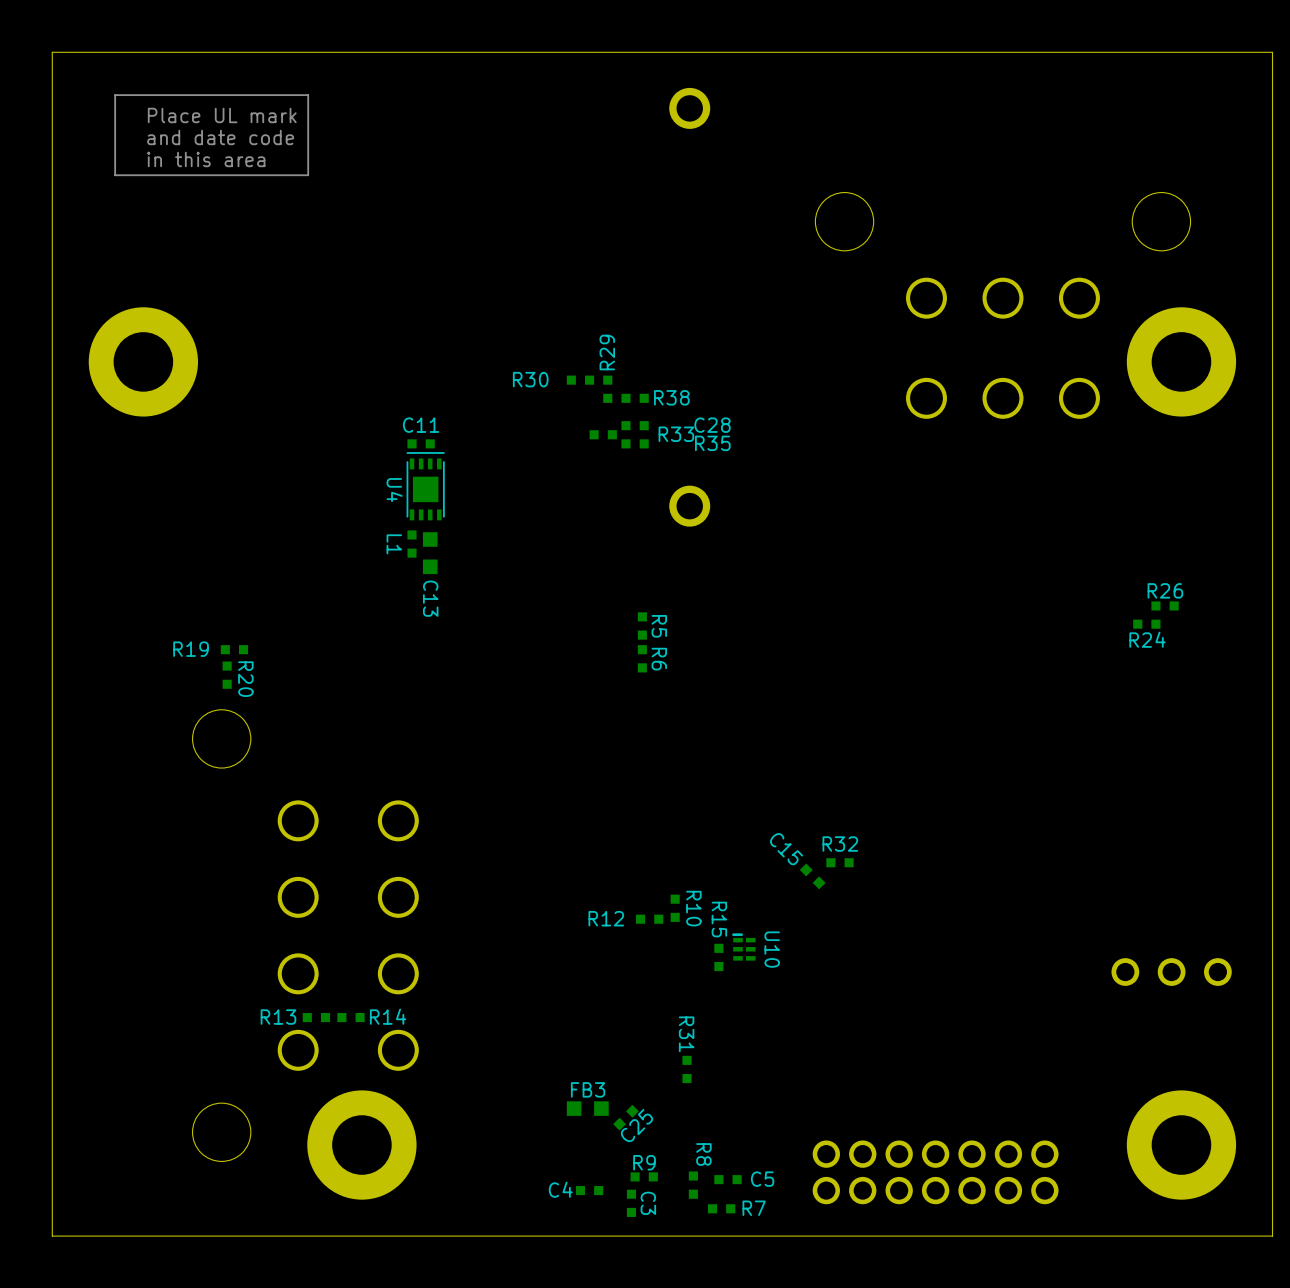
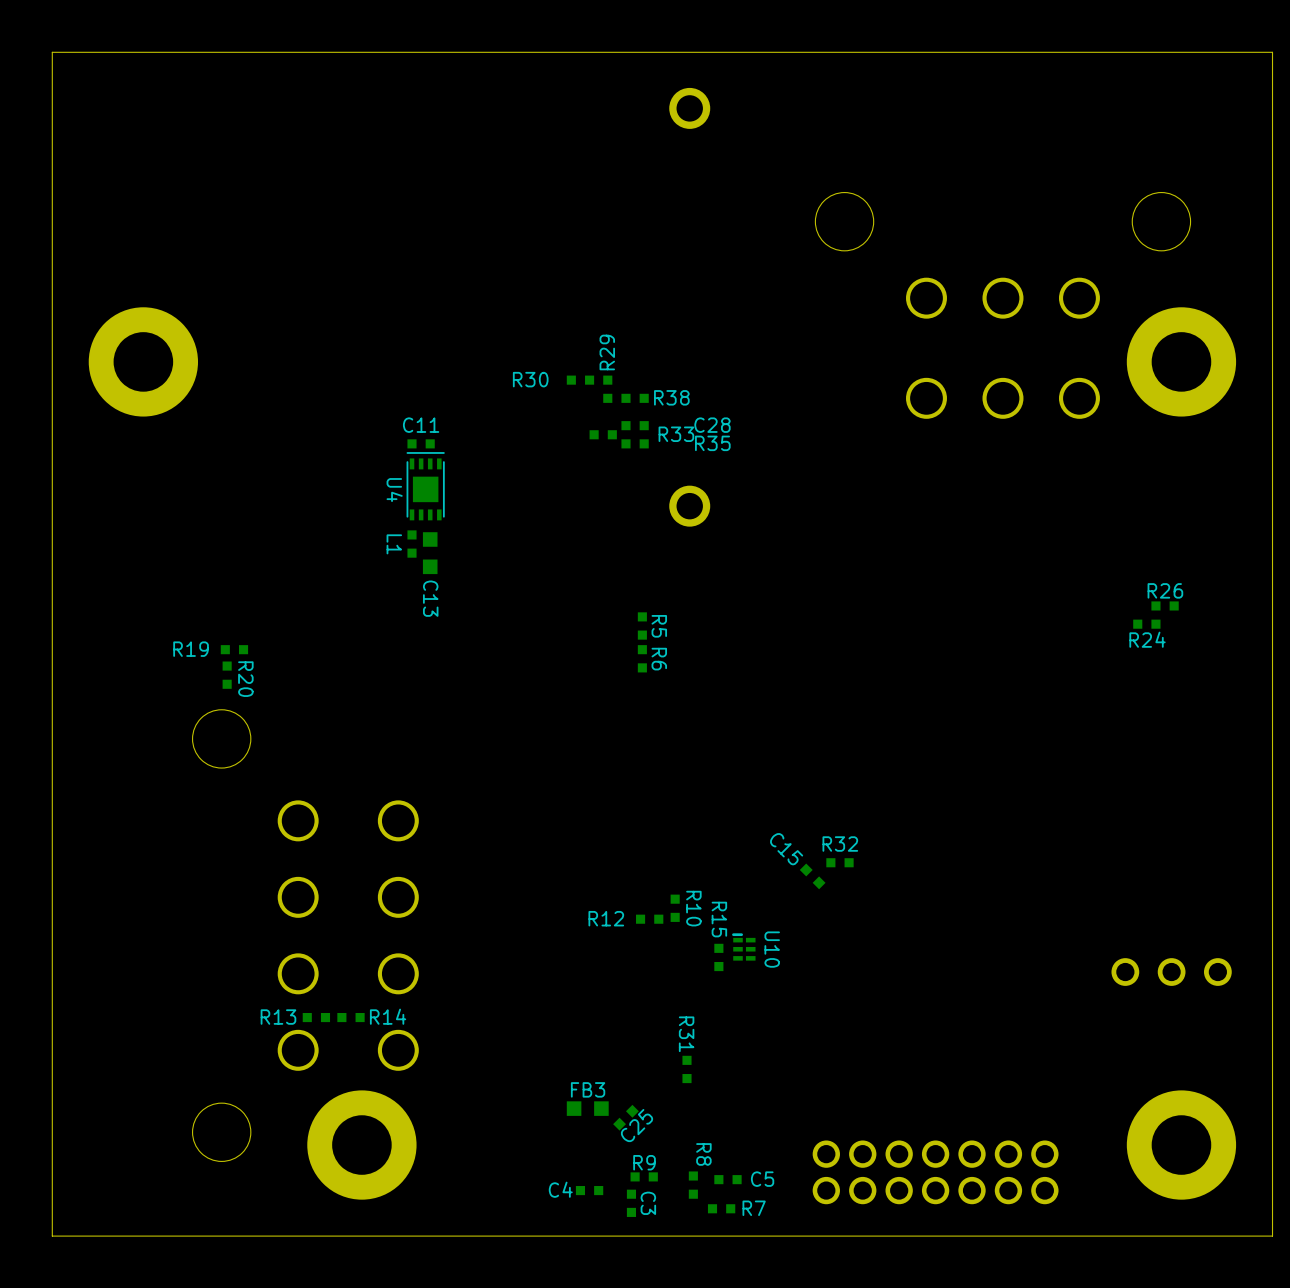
line: (308, 95) (115, 95) (115, 175) (308, 175) (308, 95) -> none
text: Place UL mark (222, 115) -> none
text: and date code (220, 137) -> none
text: in this area (206, 159) -> none

